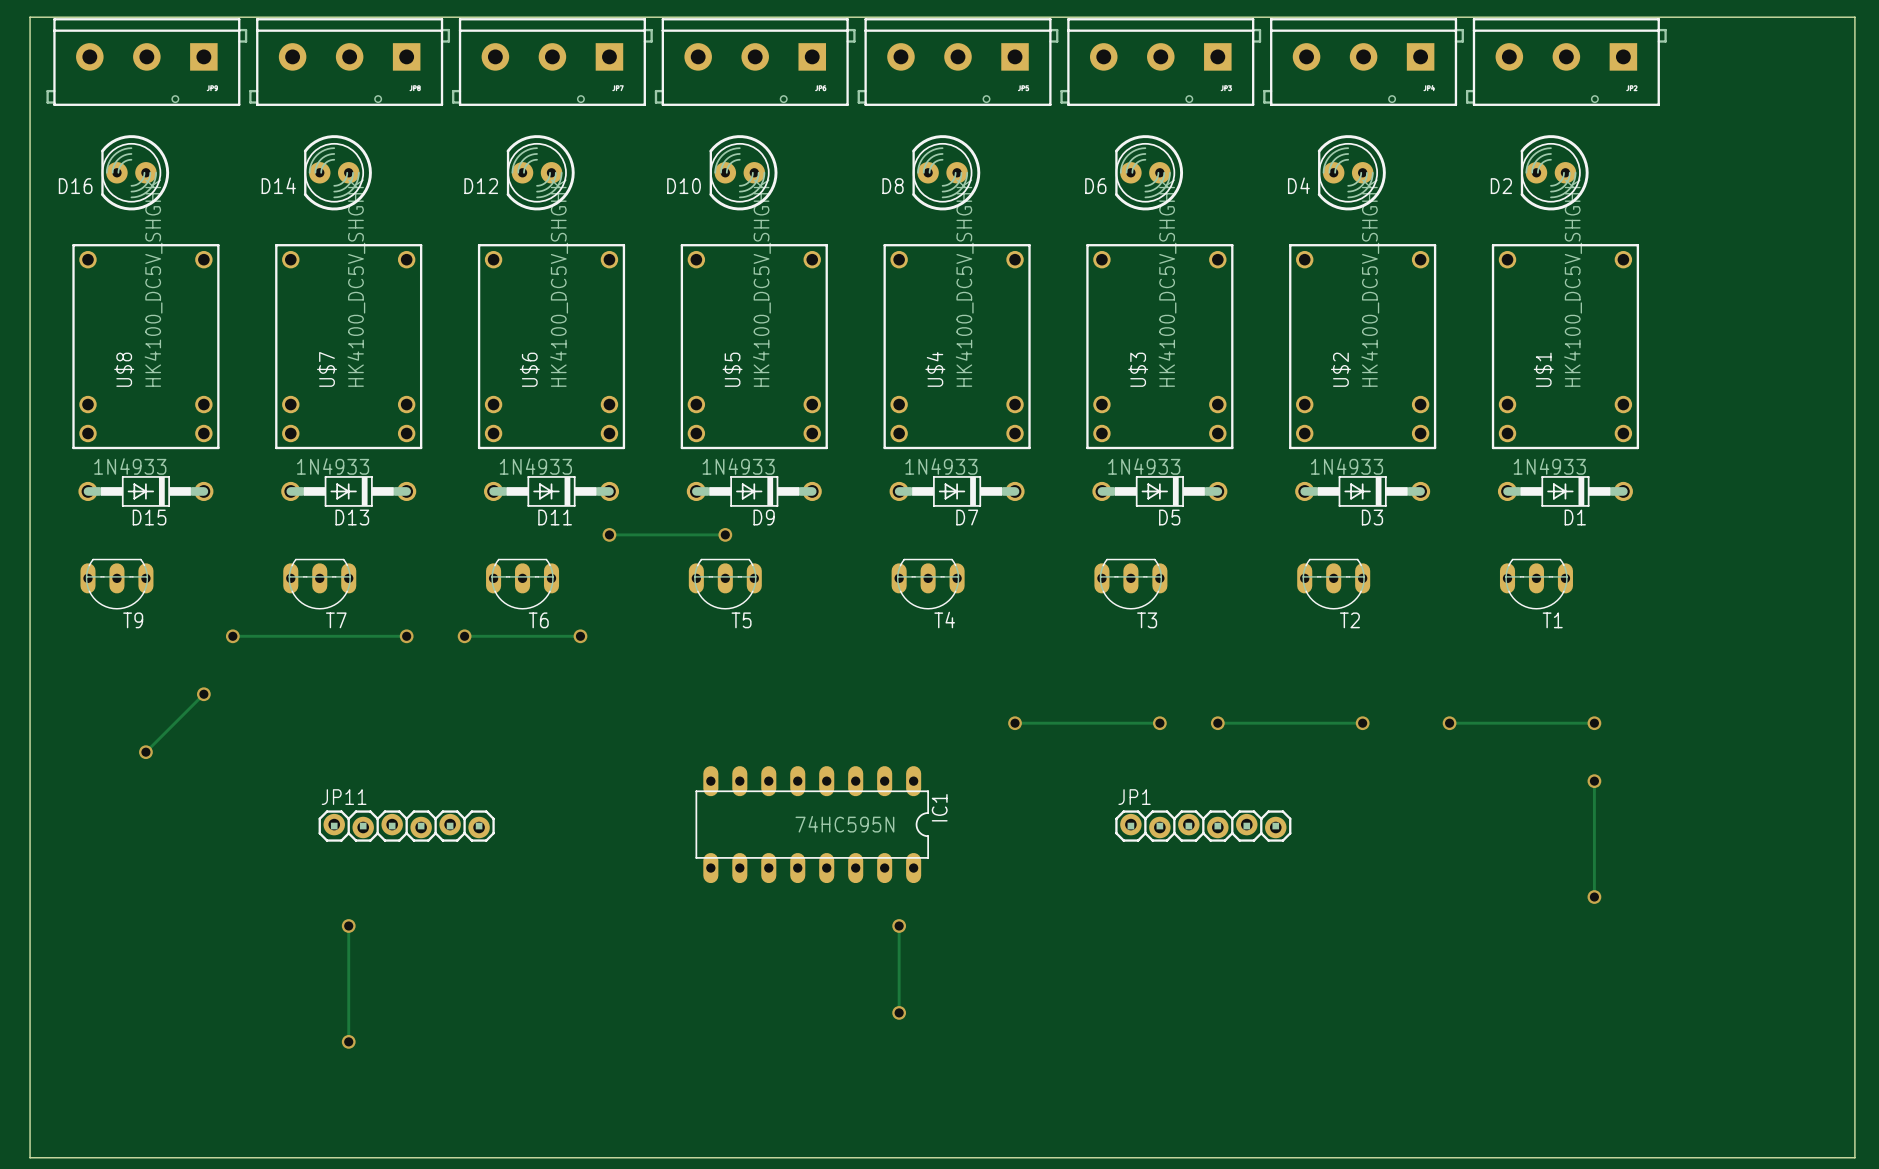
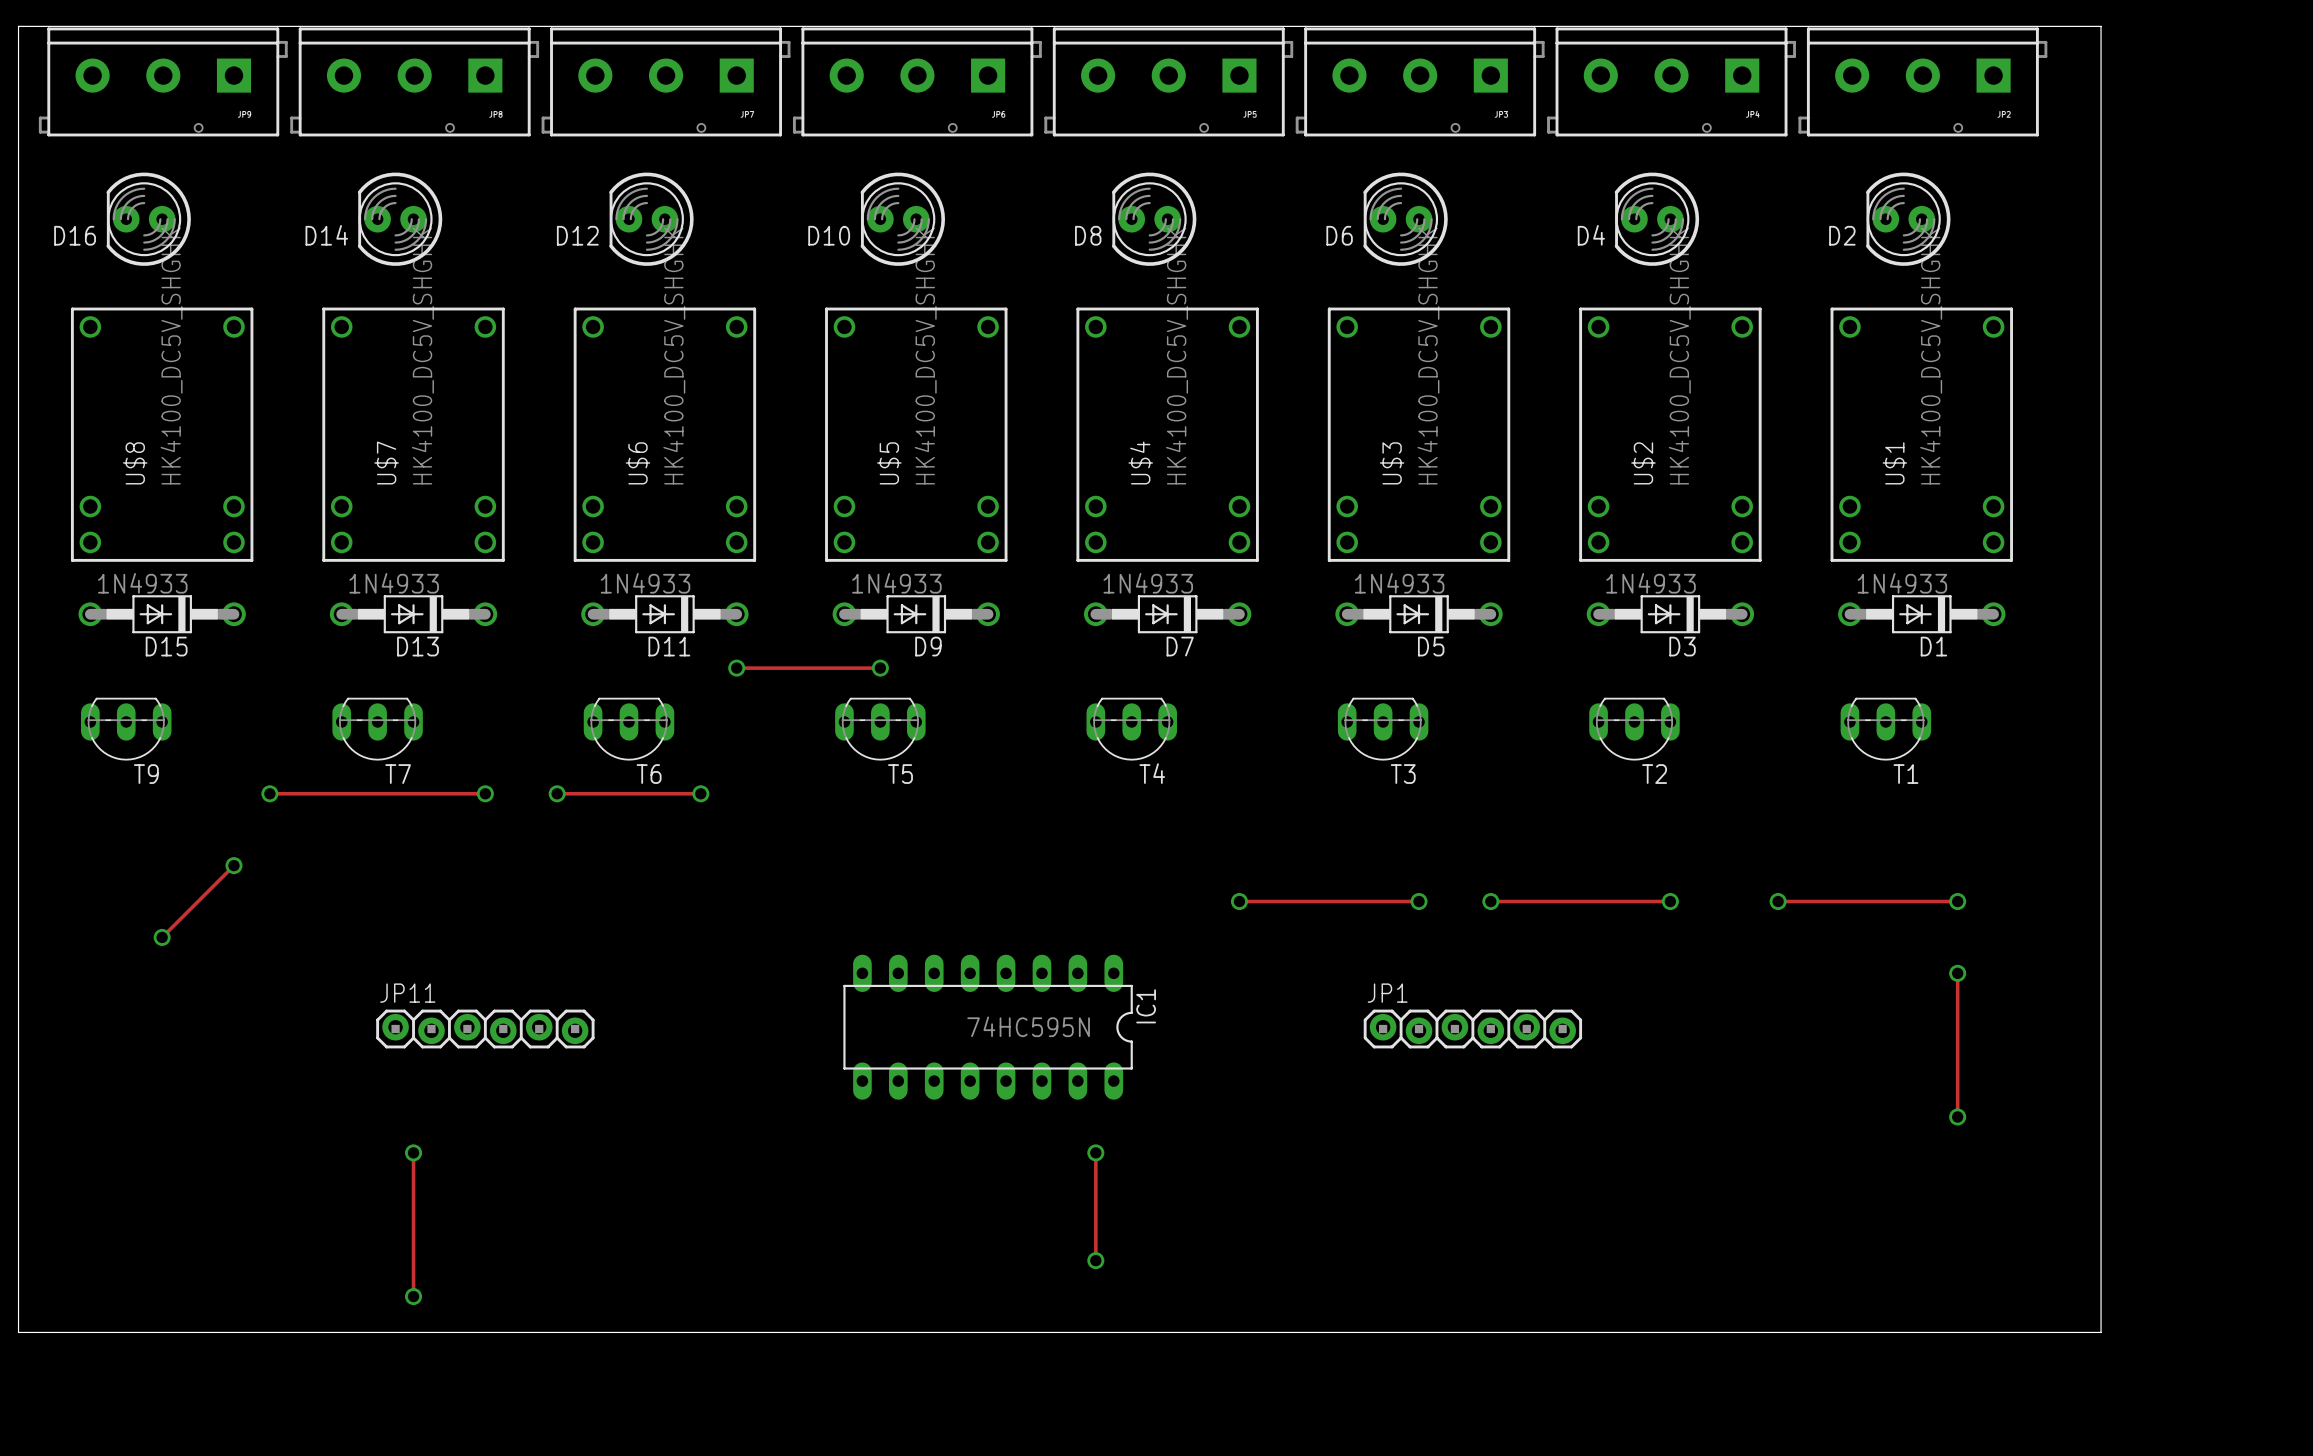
board edge: (1710, 17) (1854, 17) (1854, 1157) (30, 1157) (30, 1070) -> (2101, 26) (2101, 1332) (18, 1332)

